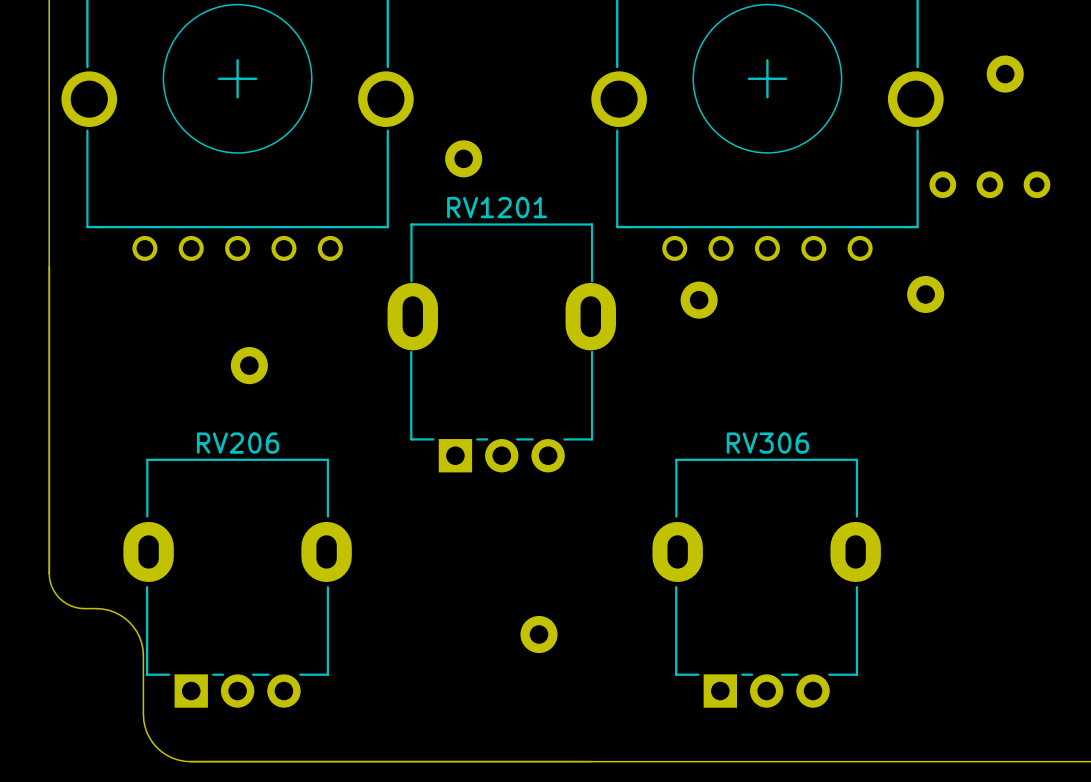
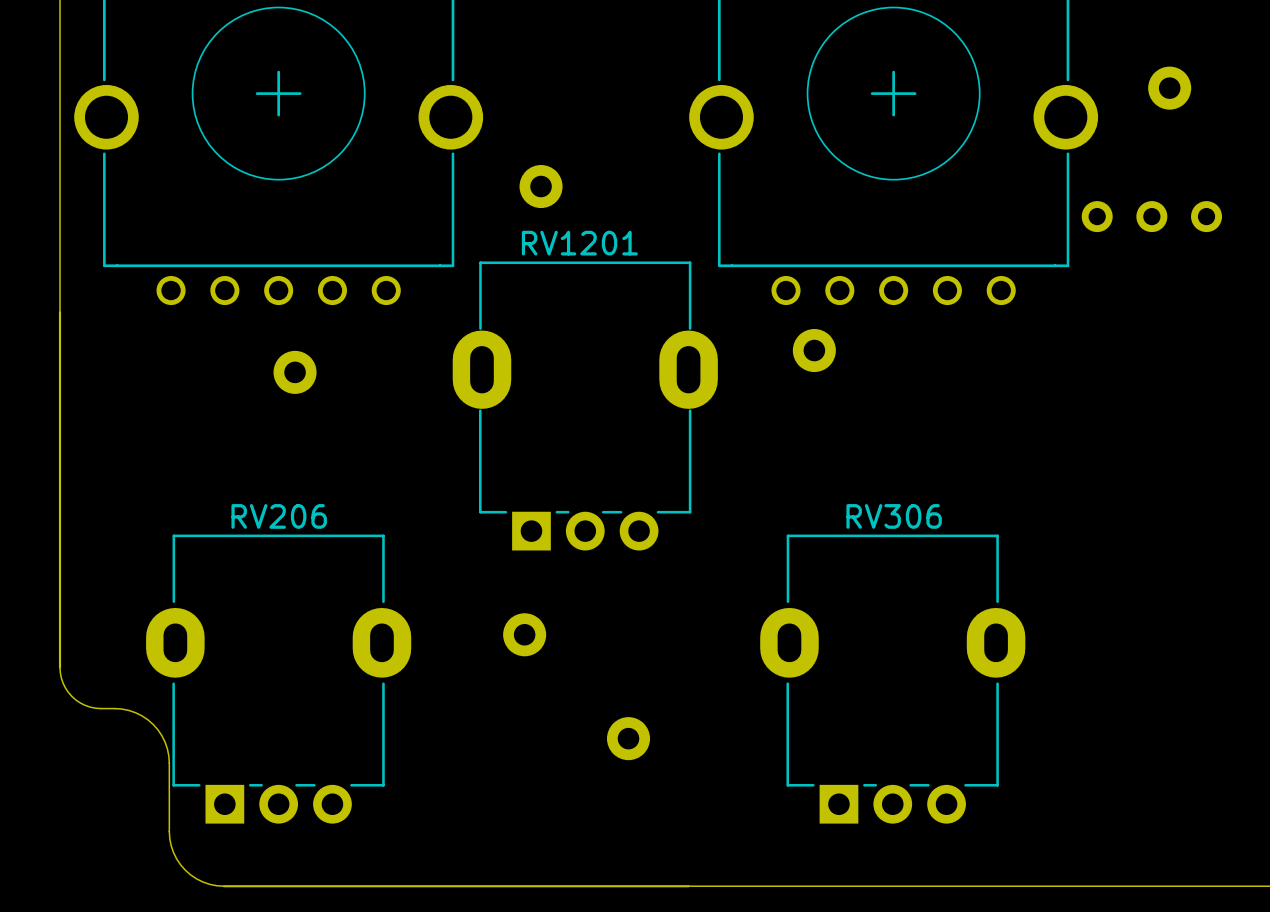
part: (925, 294) -> none
part position: (249, 365) -> (295, 372)
part: none -> (524, 634)

